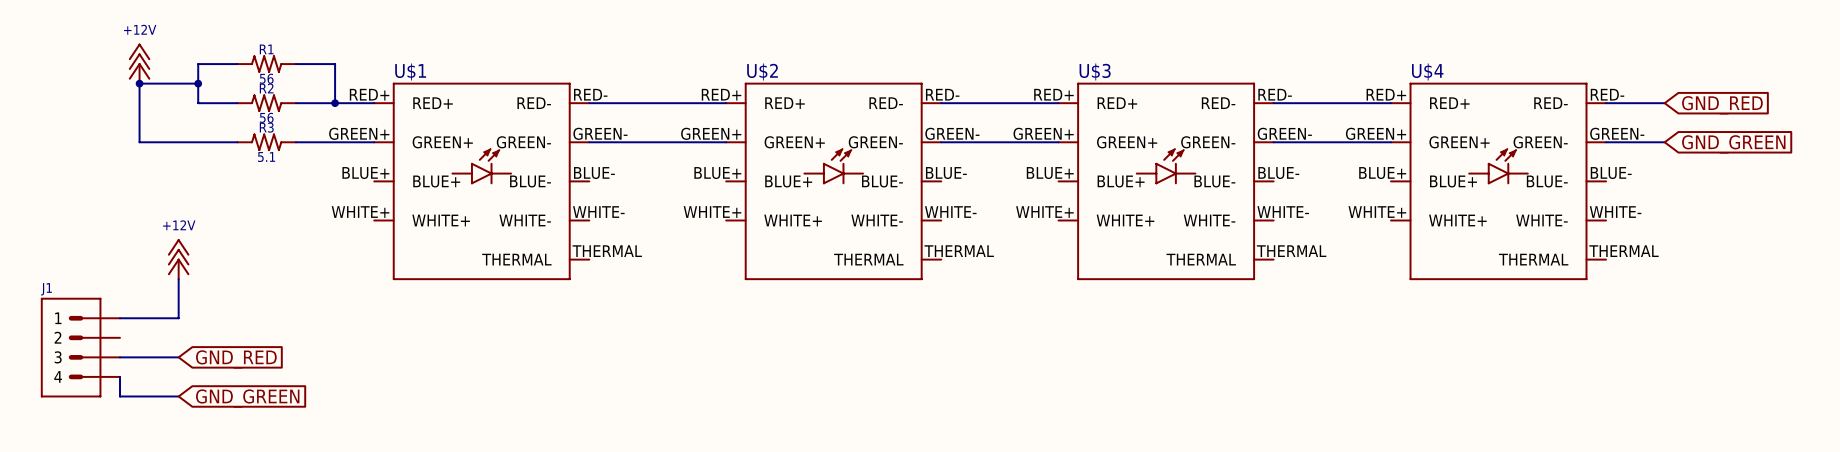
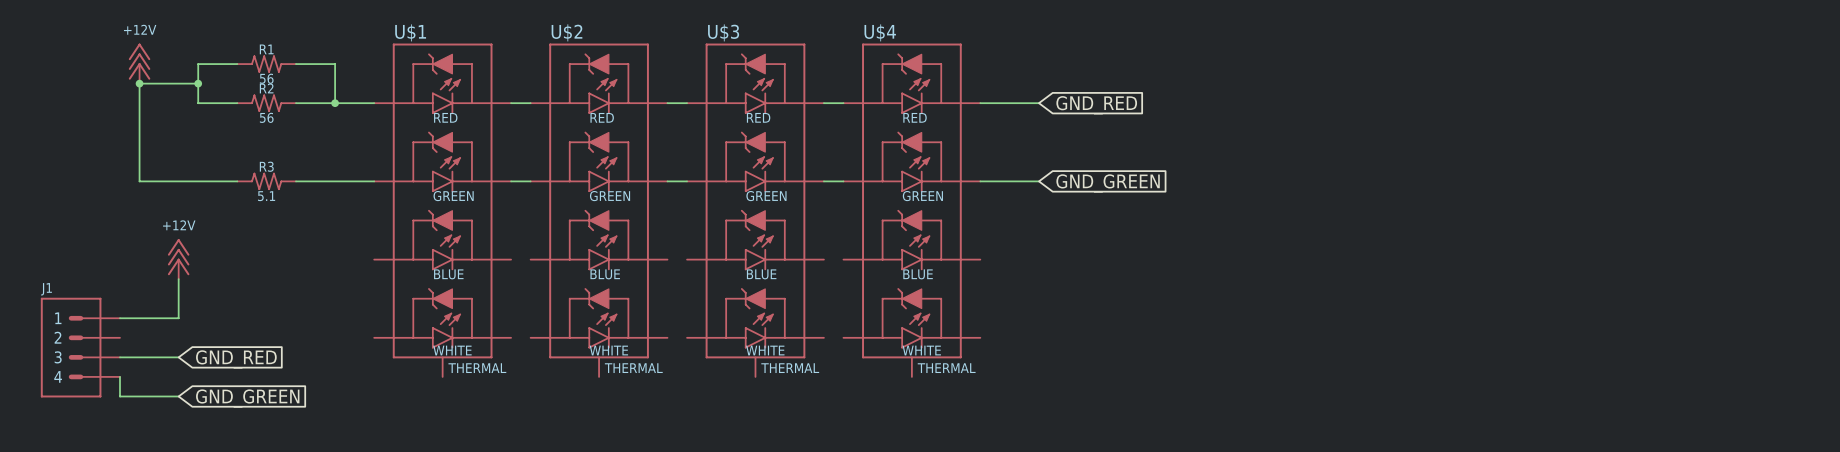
U$1 name position: U$1 (410, 72) -> U$1 (410, 32)
U$2 name position: U$2 (762, 72) -> U$2 (566, 32)
U$3 name position: U$3 (1095, 72) -> U$3 (723, 32)
U$4 name position: U$4 (1427, 72) -> U$4 (880, 32)
U$1 symbol: [374, 82, 590, 281] -> [374, 43, 512, 377]
U$2 symbol: [726, 82, 942, 281] -> [530, 43, 668, 377]
U$3 symbol: [1058, 82, 1274, 281] -> [687, 43, 824, 377]
U$4 symbol: [1390, 82, 1607, 281] -> [843, 43, 981, 377]
wire: none -> (511, 103) (530, 103)
wire: none -> (823, 103) (843, 103)
wire: (1039, 103) (1058, 103) -> none
wire: (1273, 103) (1390, 103) -> none
wire: (1606, 103) (1664, 103) -> none
global label: none -> GND_RED (1096, 105)
global label: GND_RED (1722, 105) -> none
wire: (139, 142) (237, 142) -> (139, 142) (139, 181) (237, 181)
R3 position: (266, 142) -> (266, 181)
wire: (295, 142) (374, 142) -> (295, 181) (374, 181)
wire: (589, 142) (726, 142) -> none
wire: (941, 142) (1058, 142) -> none
wire: (1273, 142) (1390, 142) -> none
wire: (1606, 142) (1664, 142) -> none
global label: GND_GREEN (1733, 144) -> none
wire: none -> (511, 181) (530, 181)
wire: none -> (667, 181) (687, 181)
wire: none -> (823, 181) (843, 181)
wire: none -> (980, 181) (1039, 181)
global label: none -> GND_GREEN (1108, 183)

